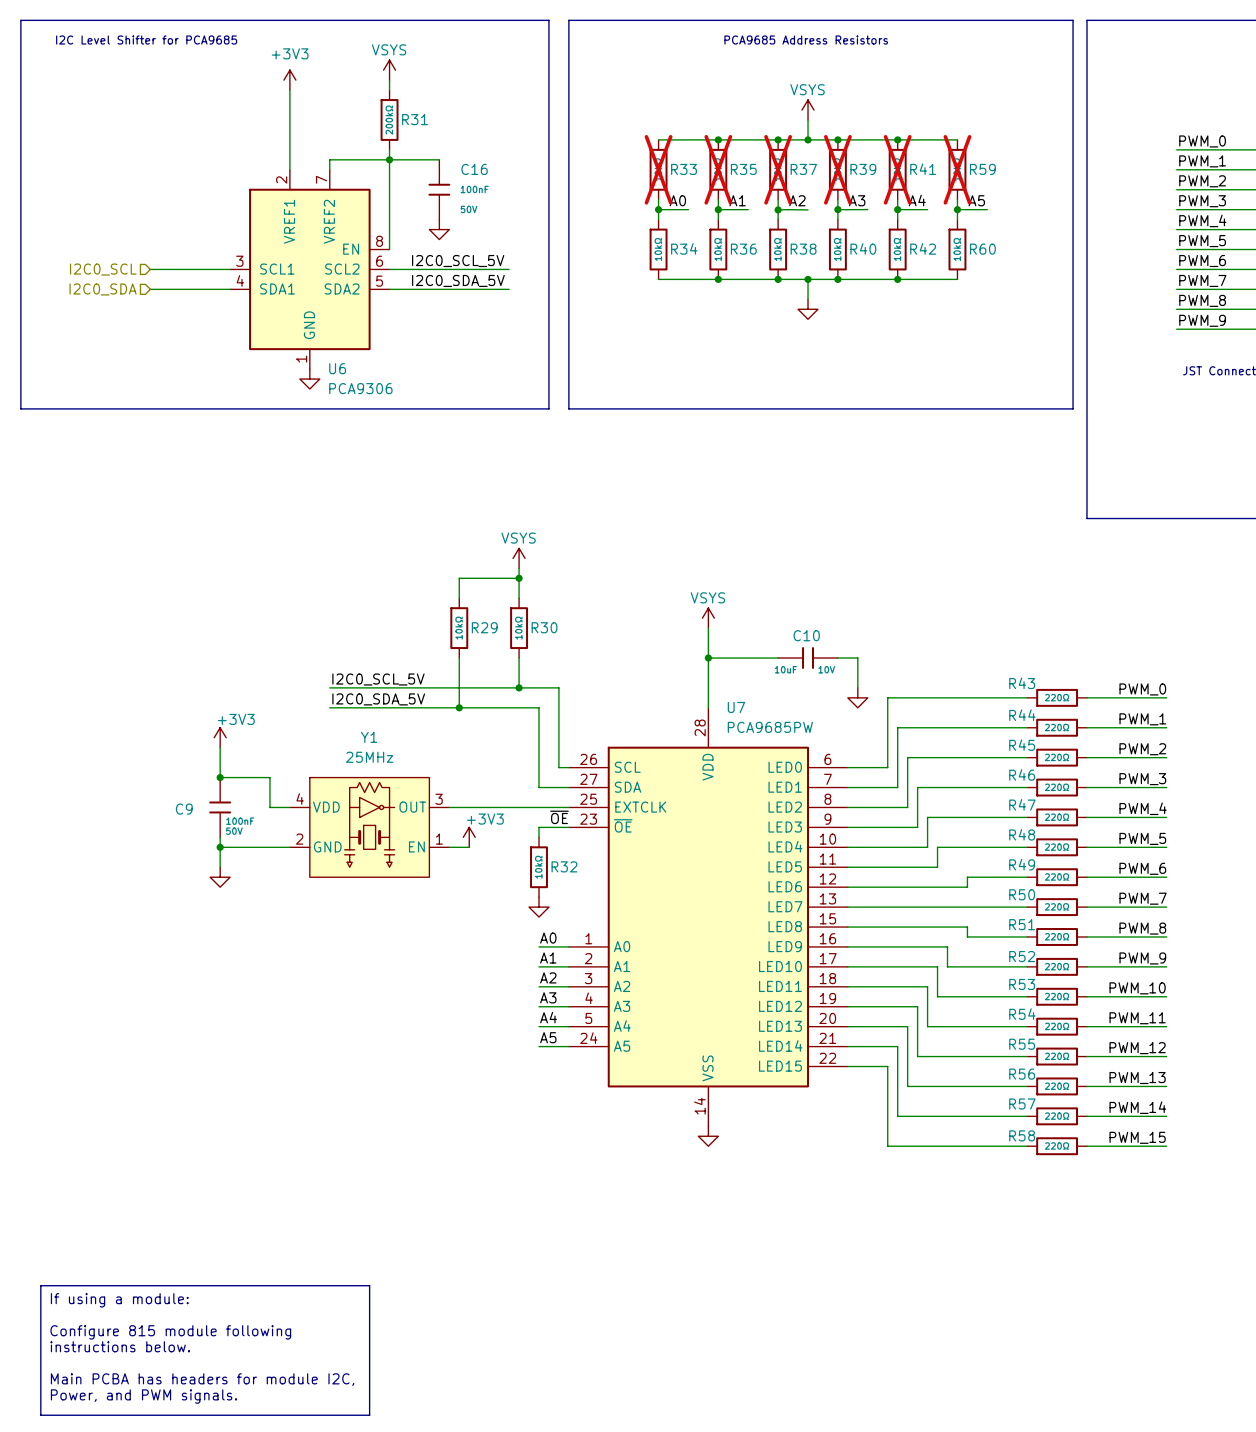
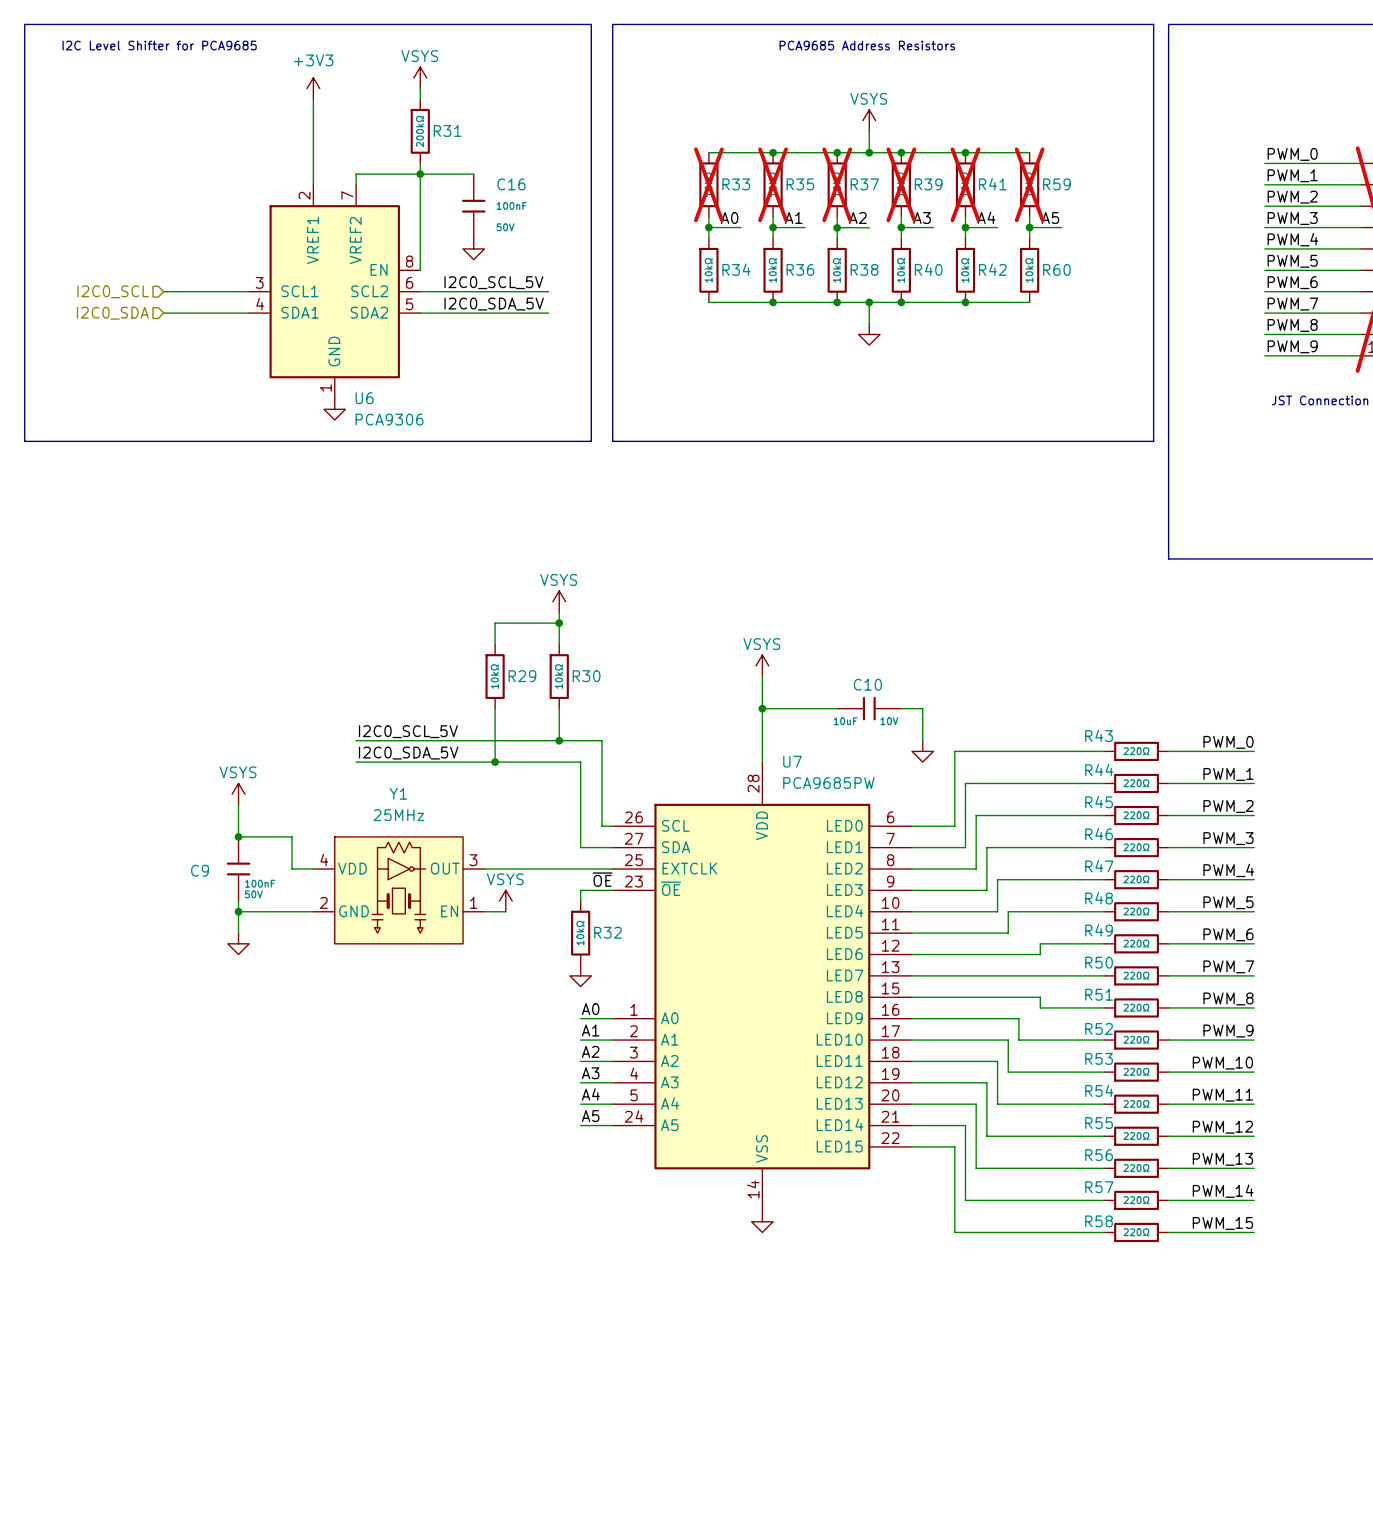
power symbol: +3V3 (220, 737) -> VSYS (238, 794)
power symbol: +3V3 (469, 837) -> VSYS (505, 901)
line: (40, 1285) (369, 1285) (369, 1415) (40, 1415) (40, 1285) -> none
text: If using a module: (119, 1300) -> none
text: Configure 815 module following (170, 1332) -> none
text: instructions below. (120, 1346) -> none
text: Main PCBA has headers for module I2C, (202, 1379) -> none
text: Power, and PWM signals. (143, 1396) -> none

